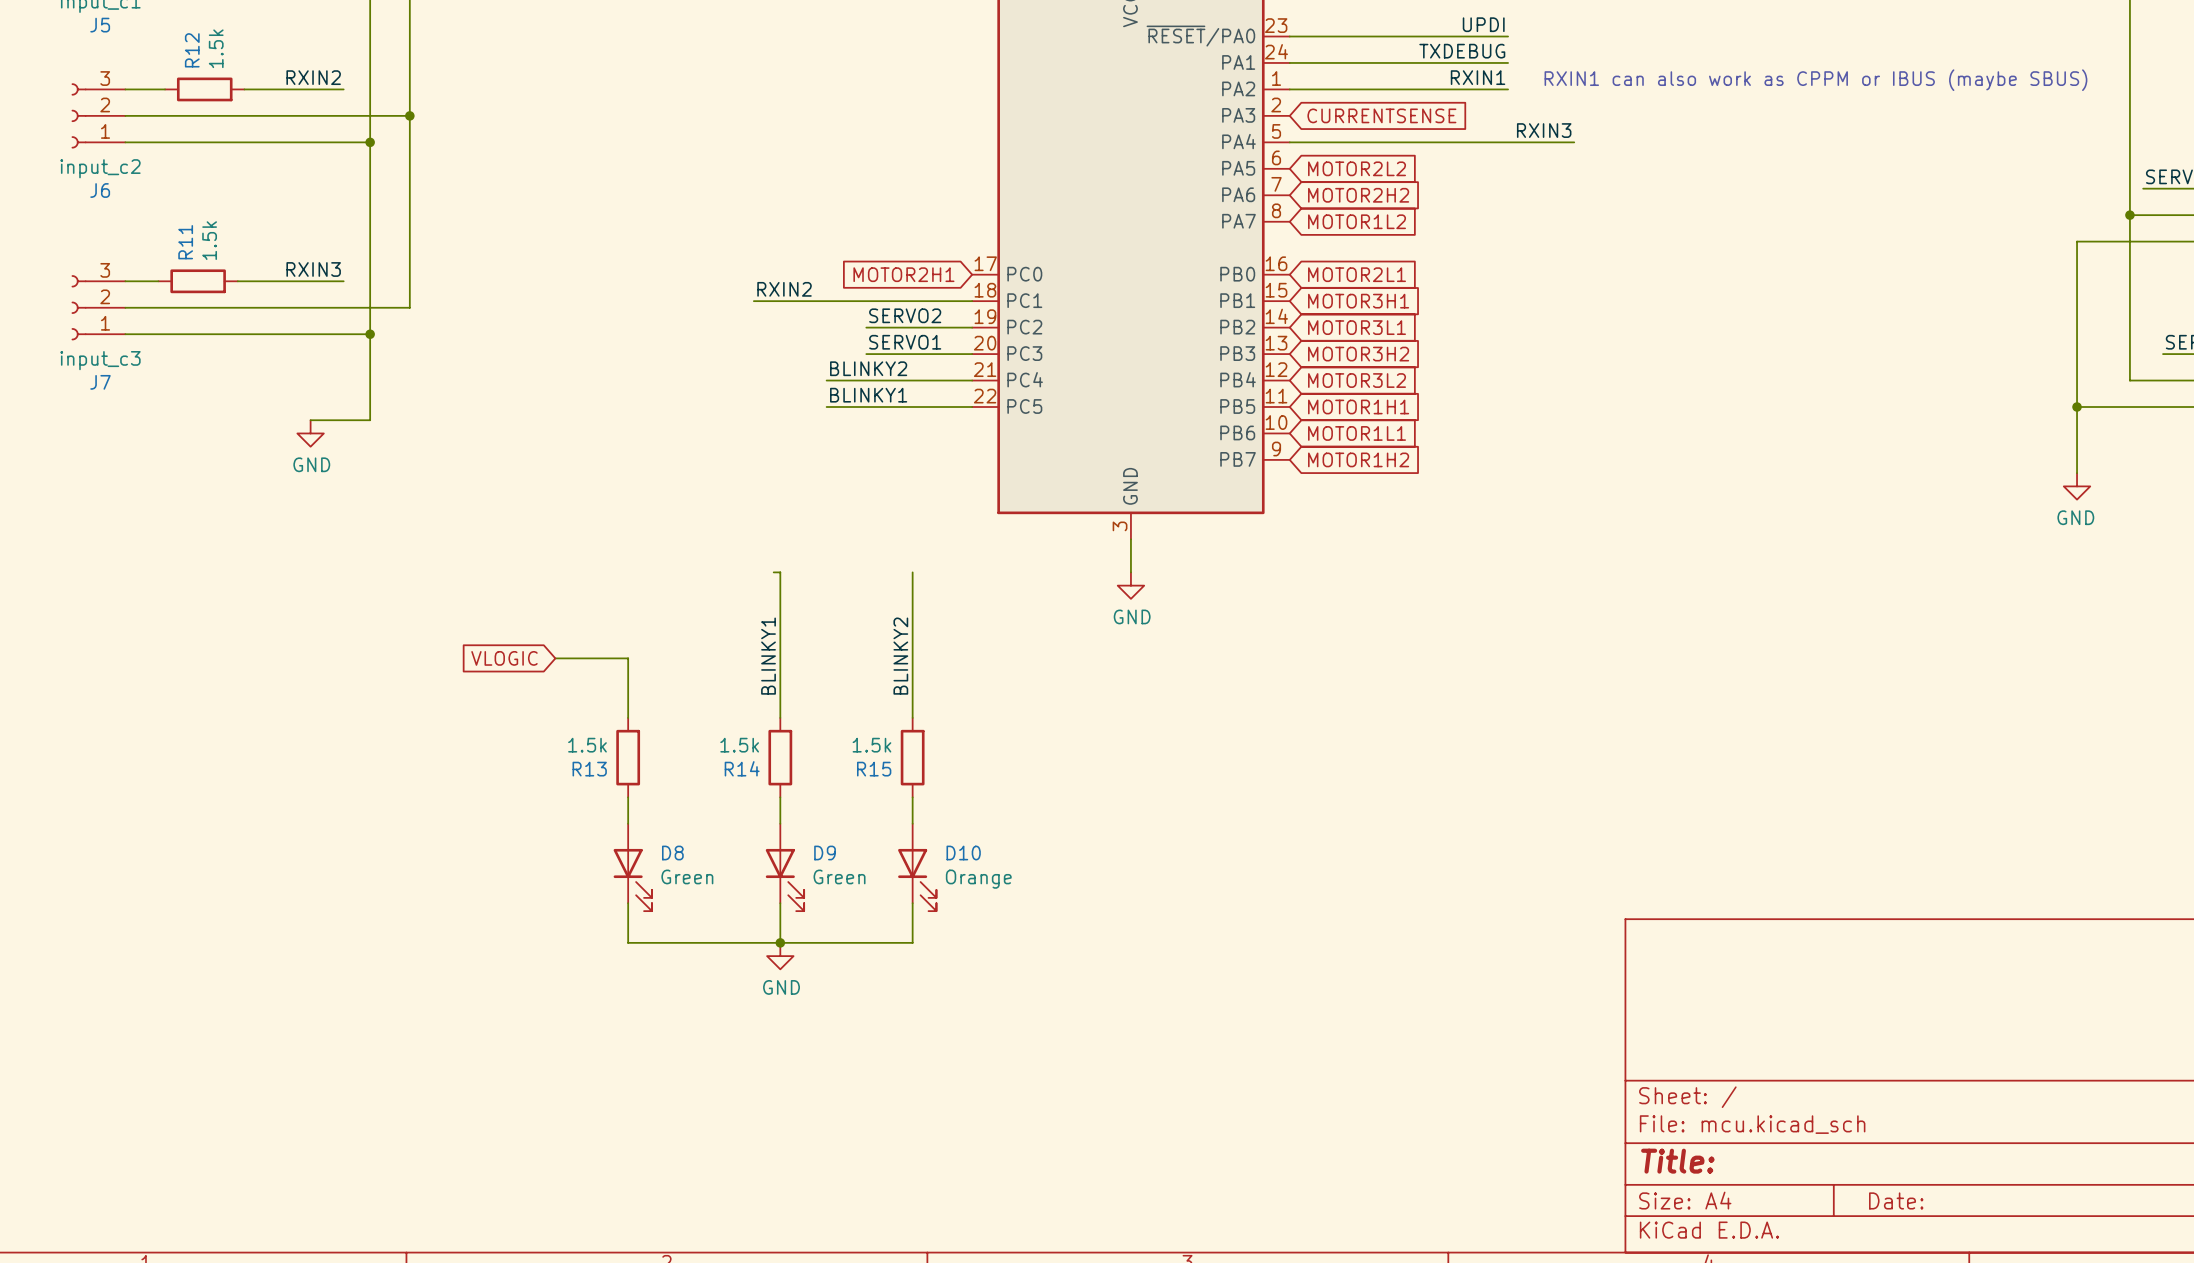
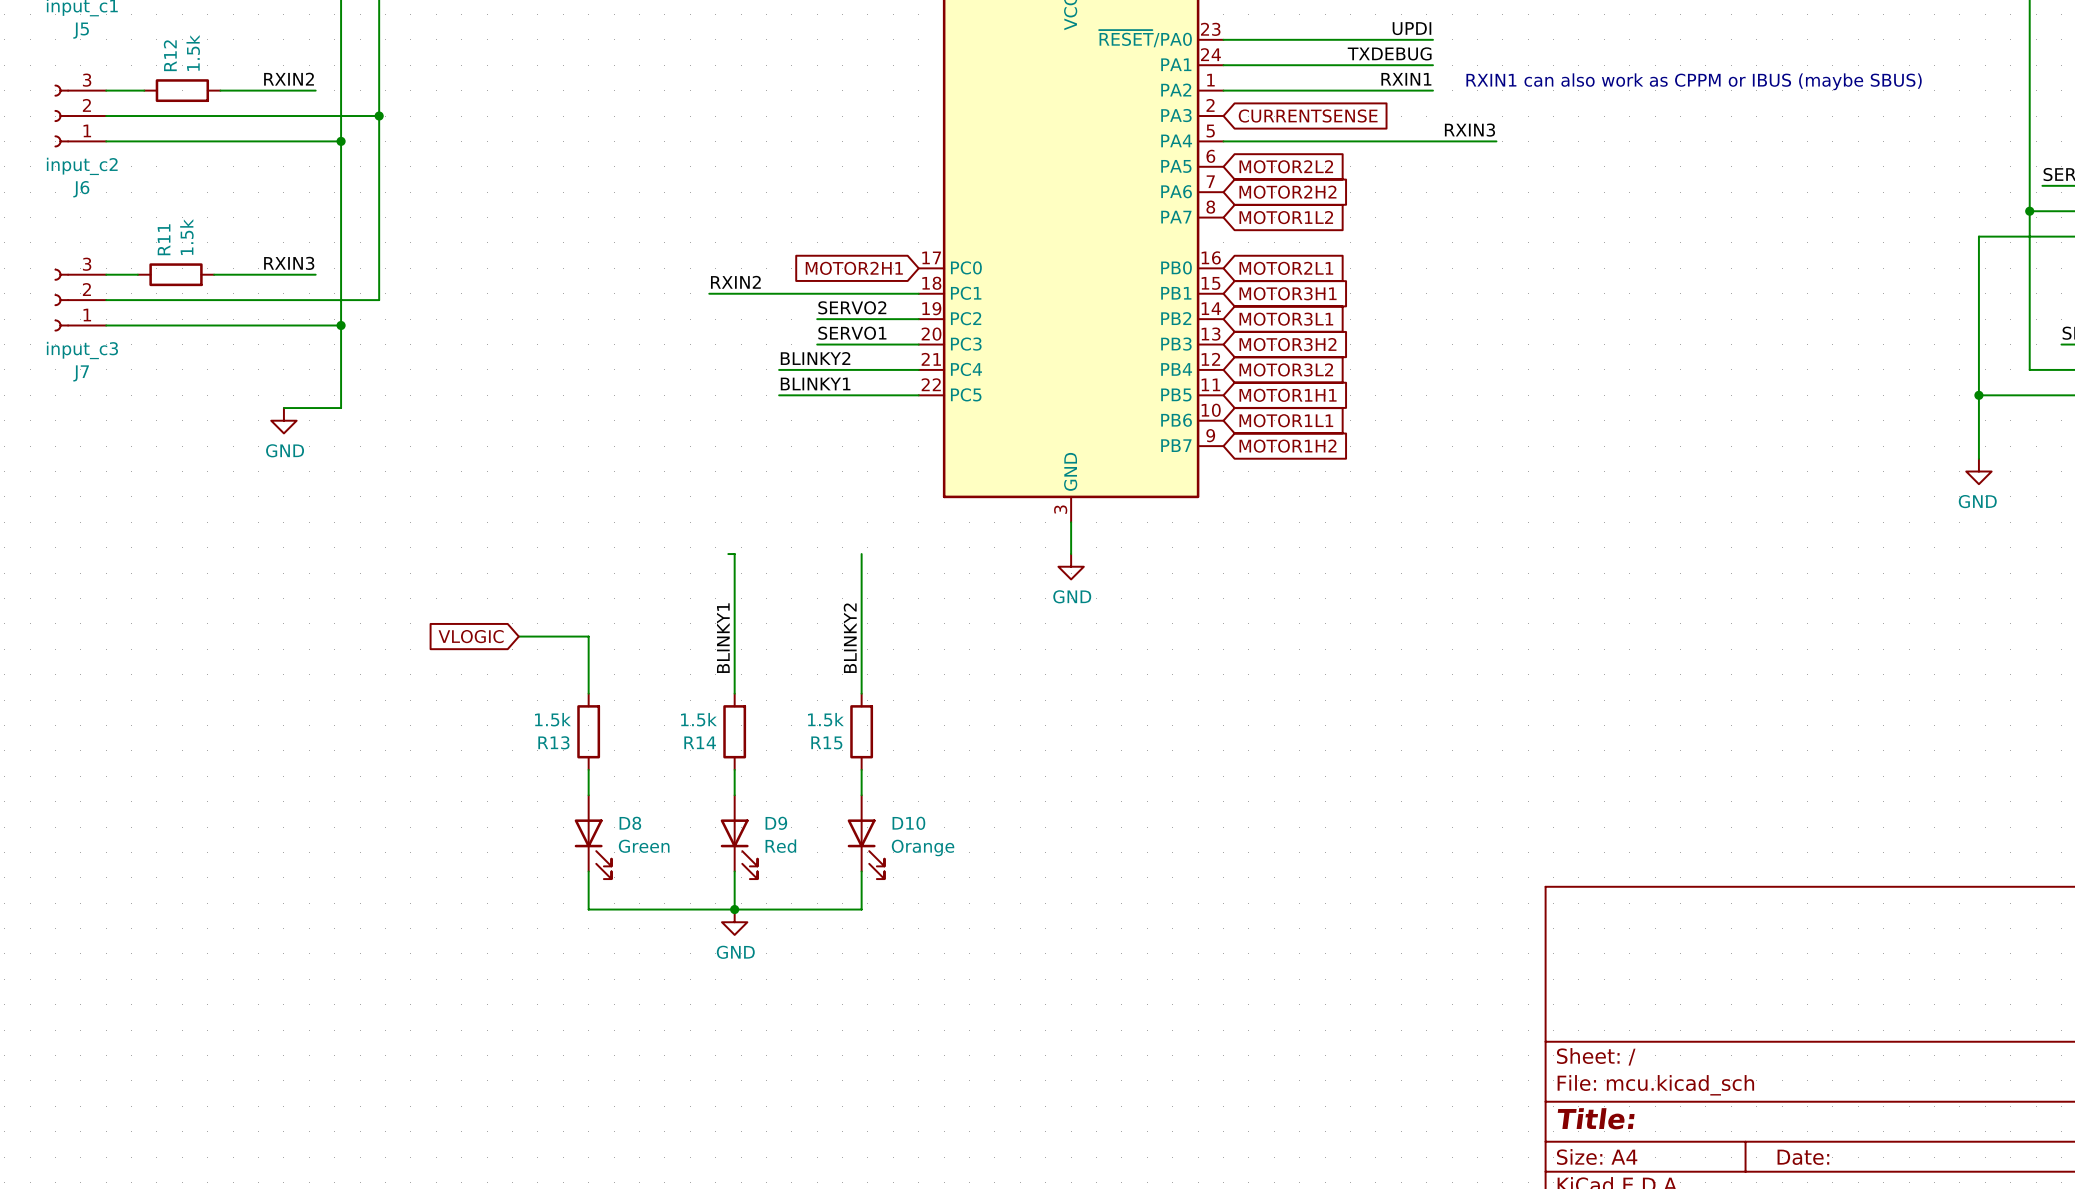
D9 value: Green (839, 876) -> Red (780, 846)

